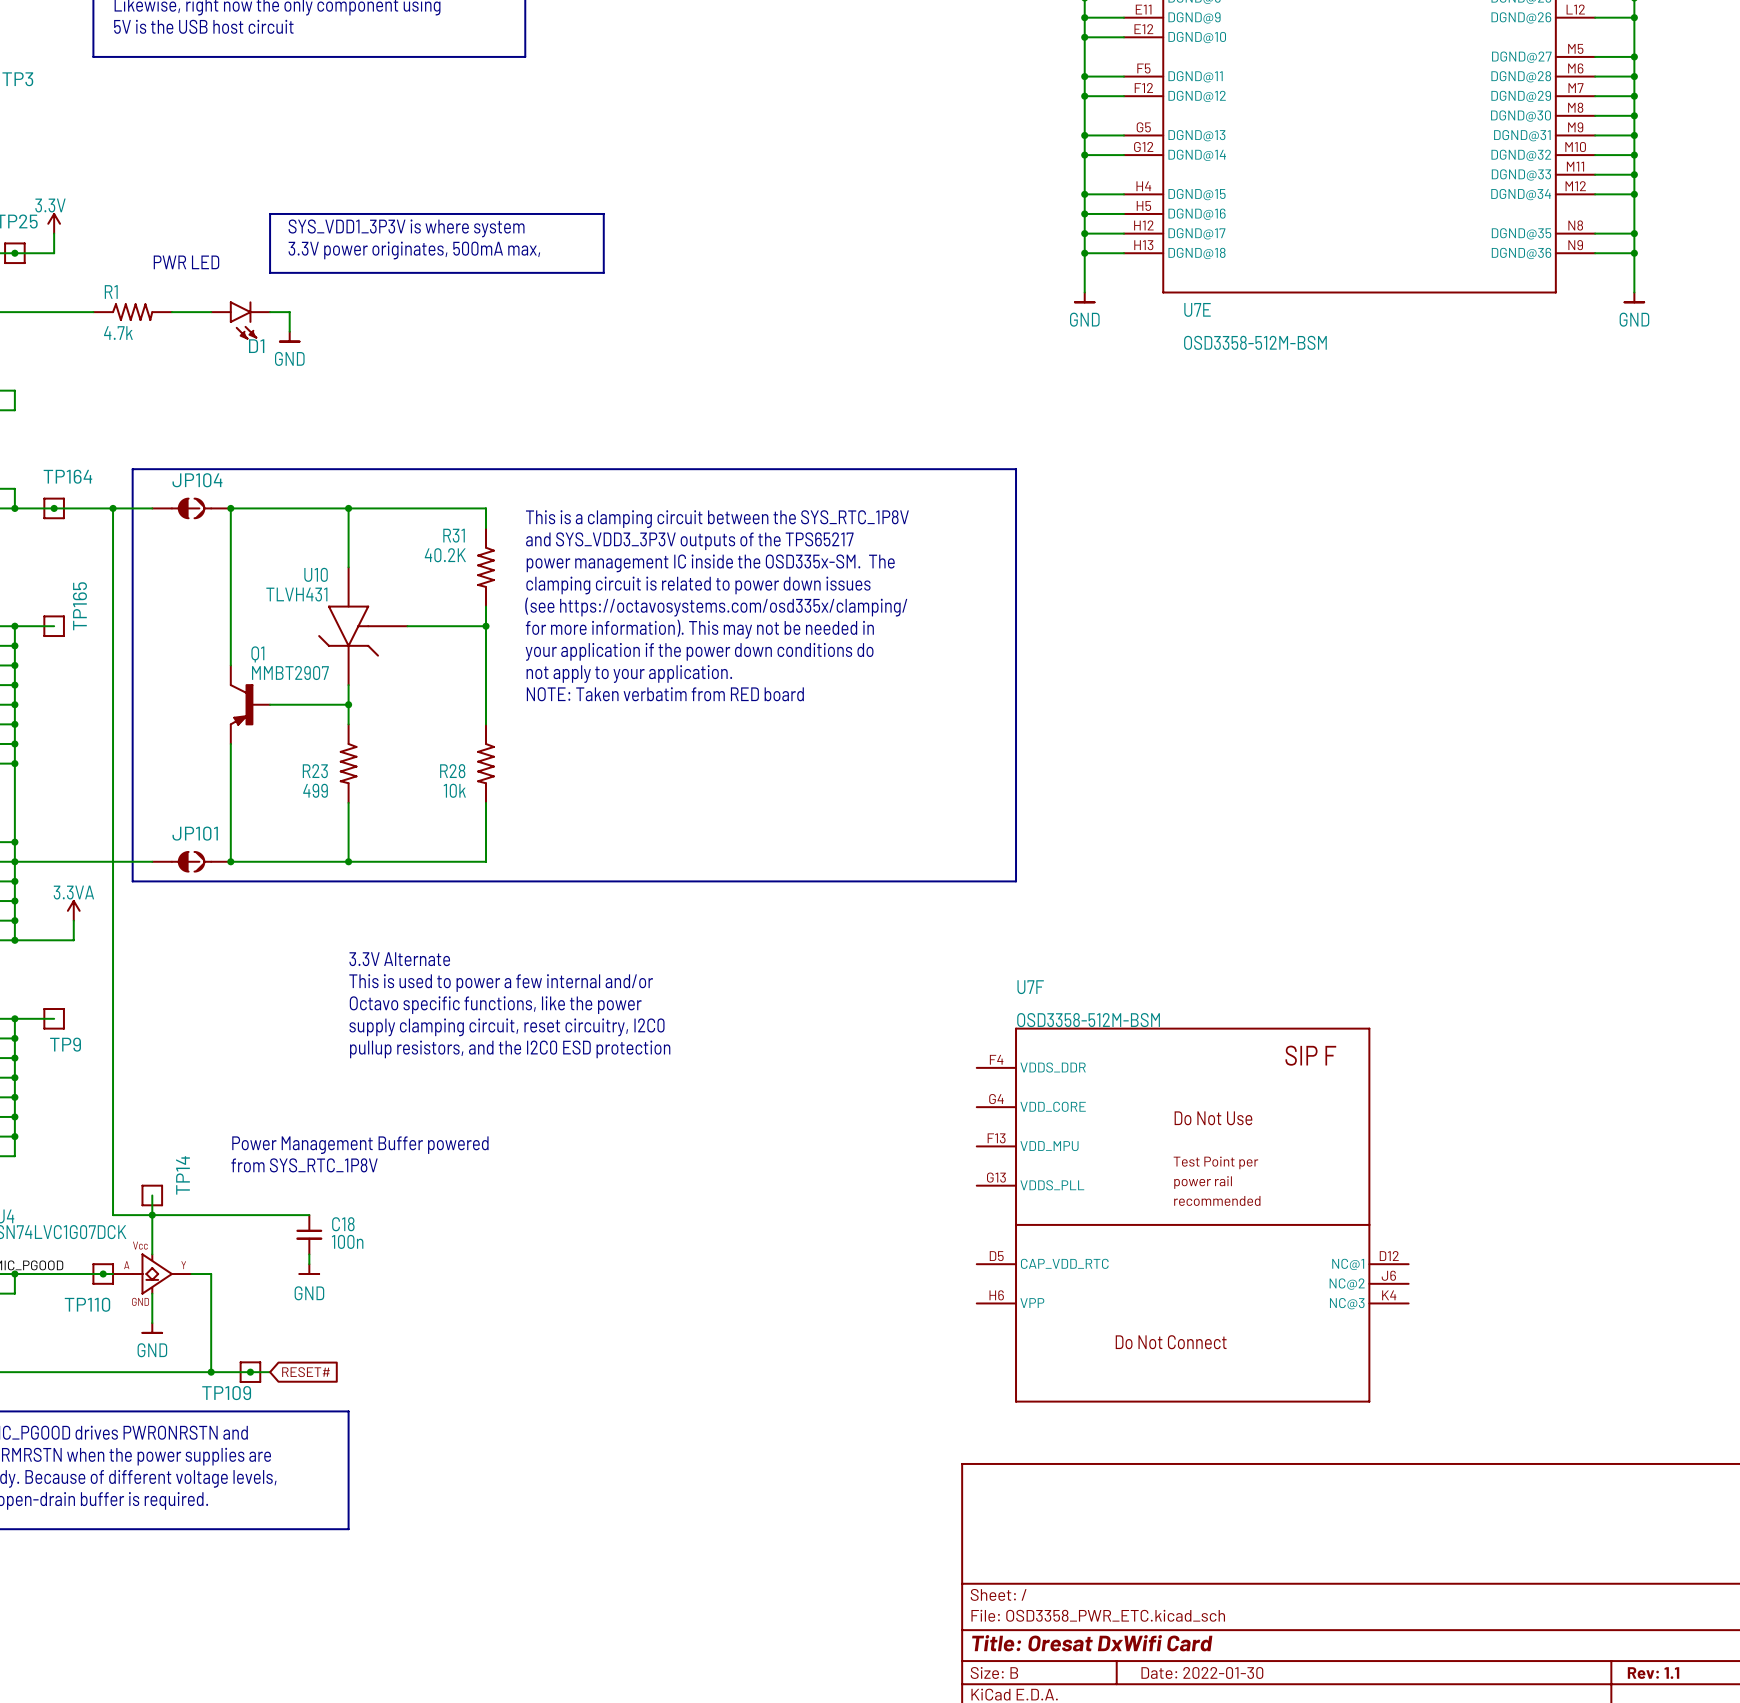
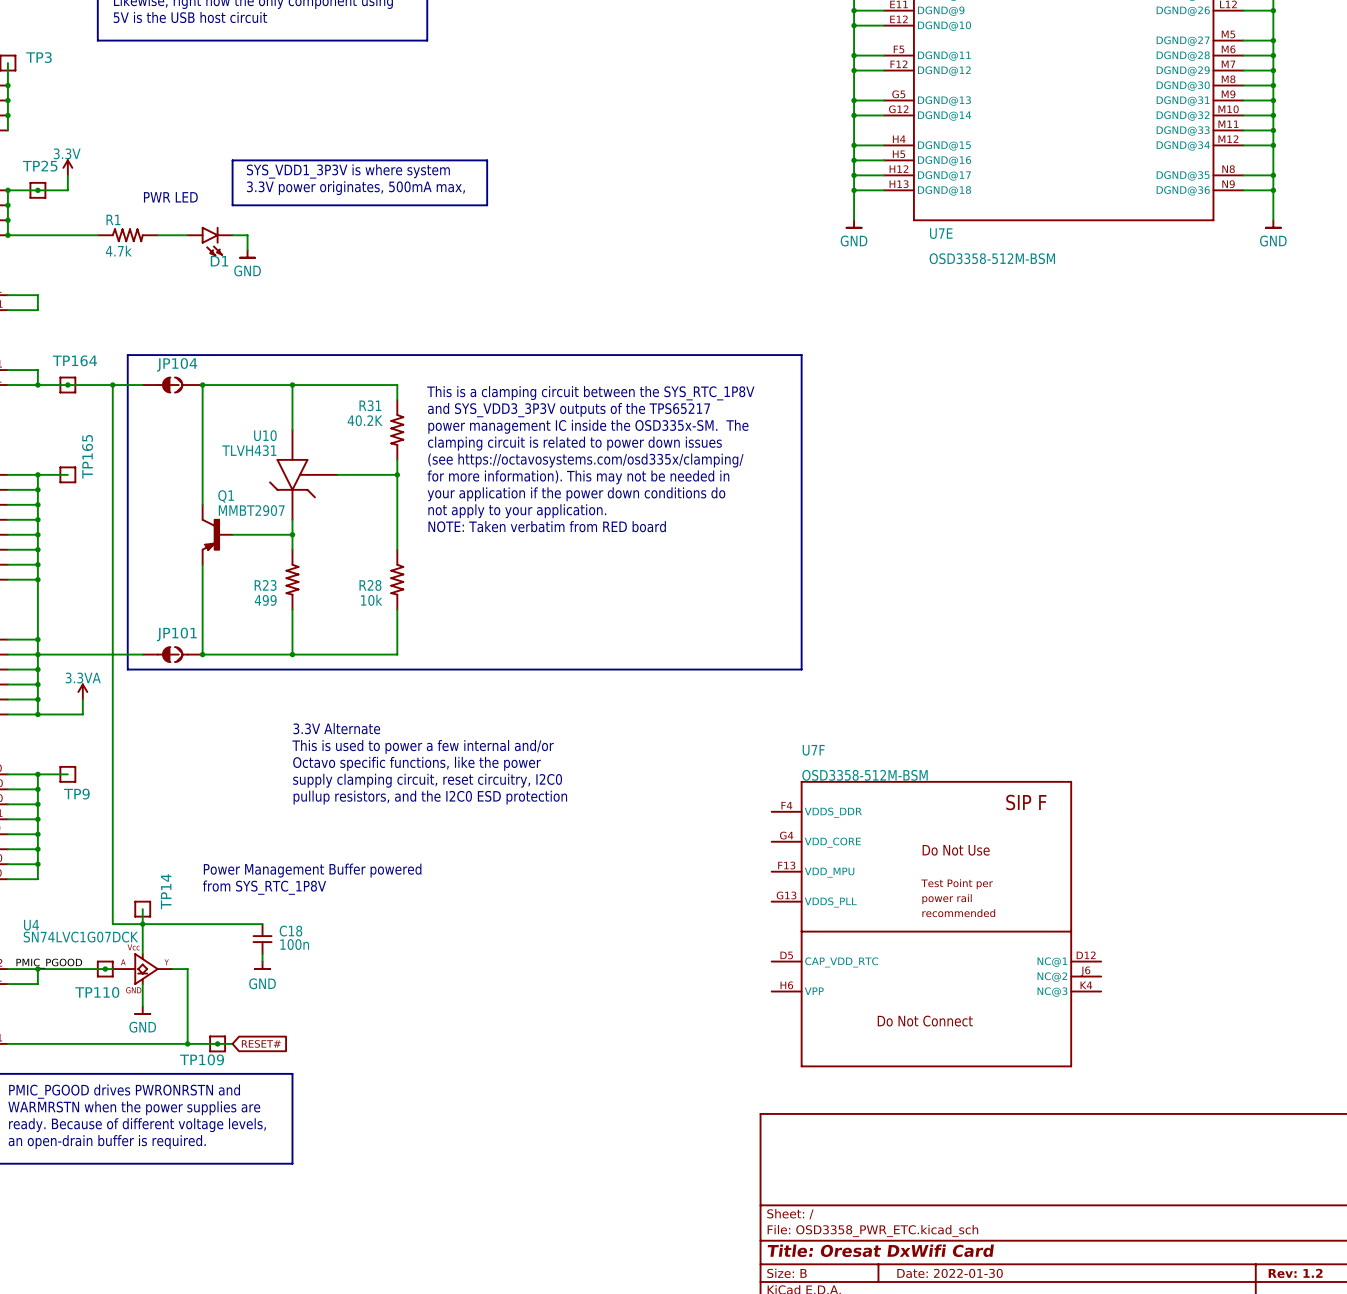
title block: Rev: 1.1 (1653, 1673) -> Rev: 1.2 (1295, 1273)

